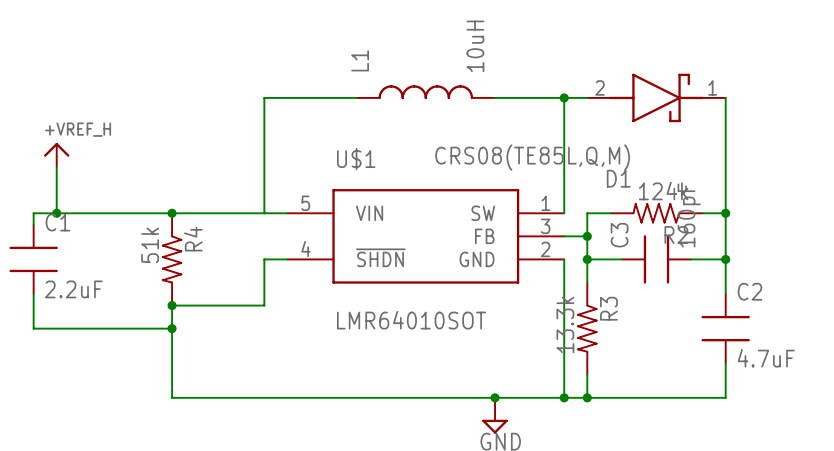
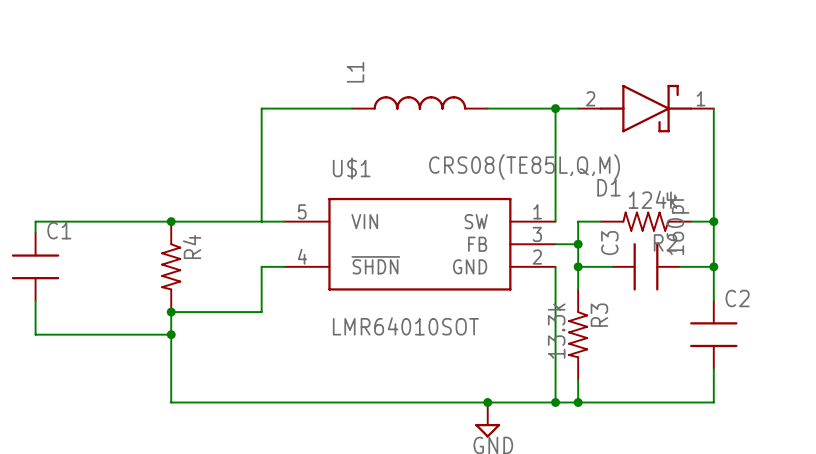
L1 value: 10uH (475, 46) -> none
power symbol: +VREF_H (56, 155) -> none
wire: (56, 167) (56, 213) -> none
junction: (56, 213) -> none
R4 value: 51k (150, 245) -> none
C1 value: 2.2uF (73, 289) -> none
C2 value: 4.7uF (766, 358) -> none

